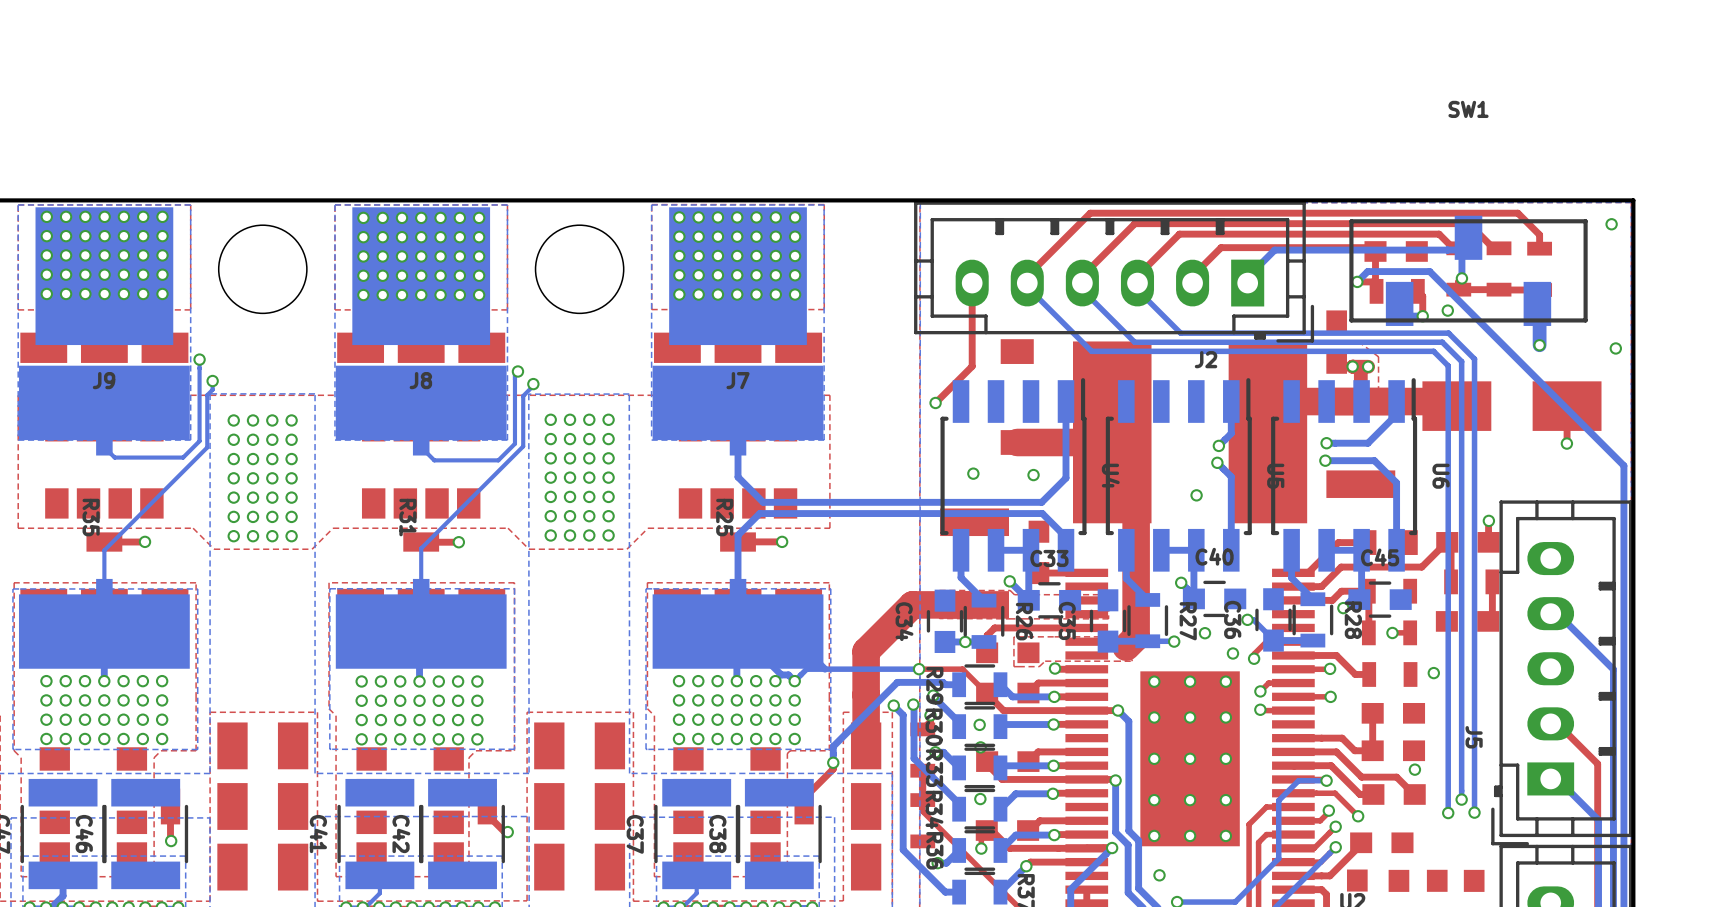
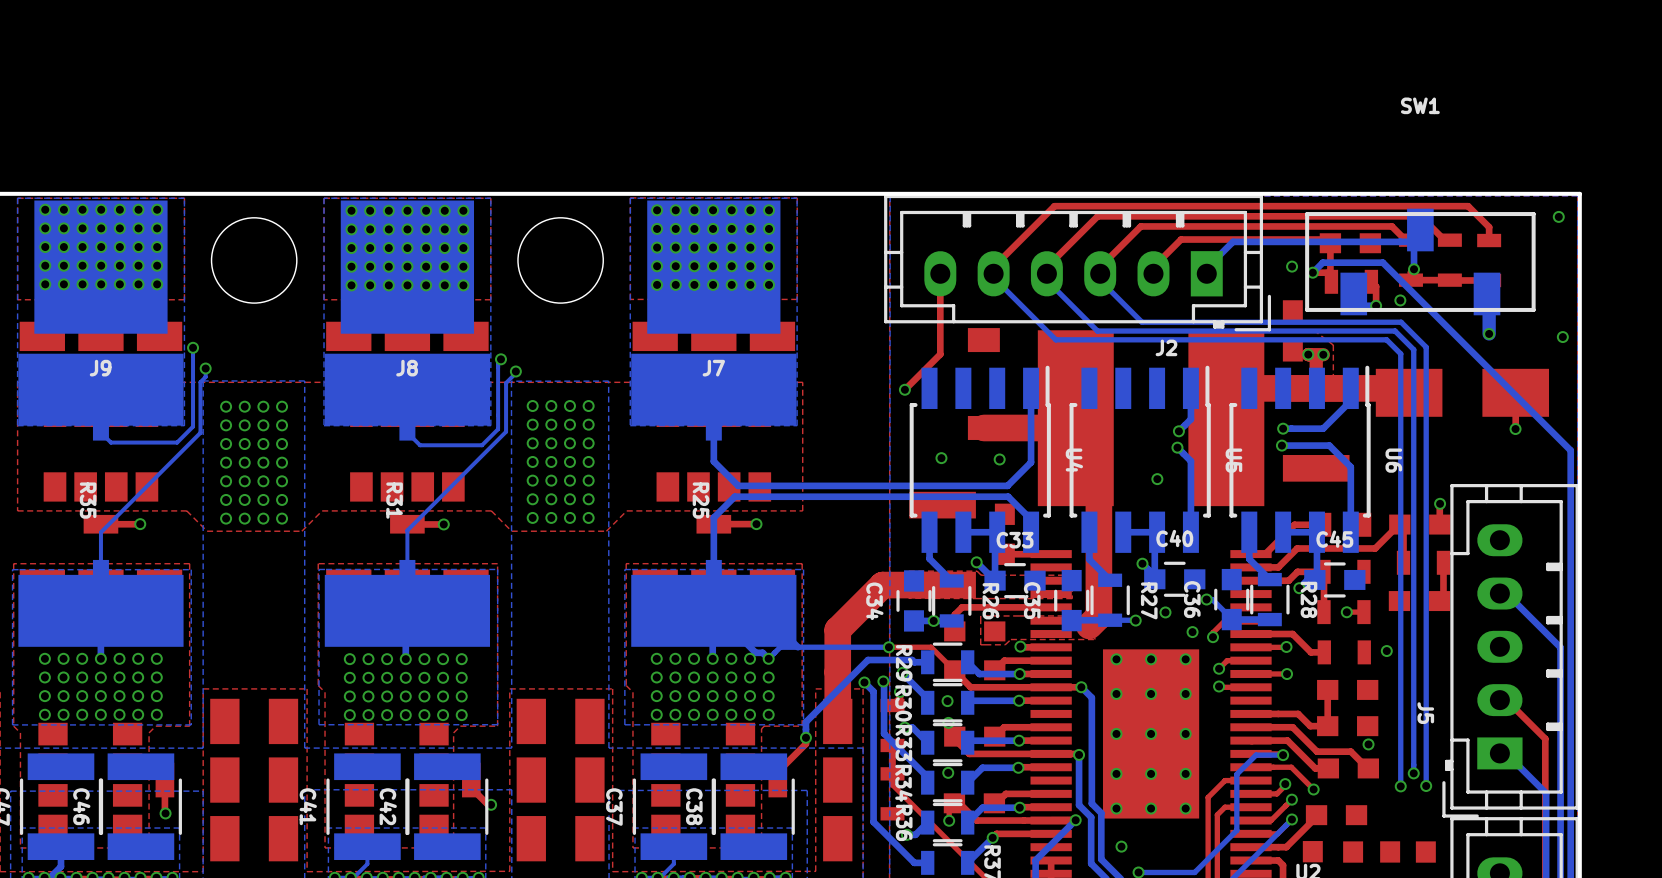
part: none -> (1292, 266)

